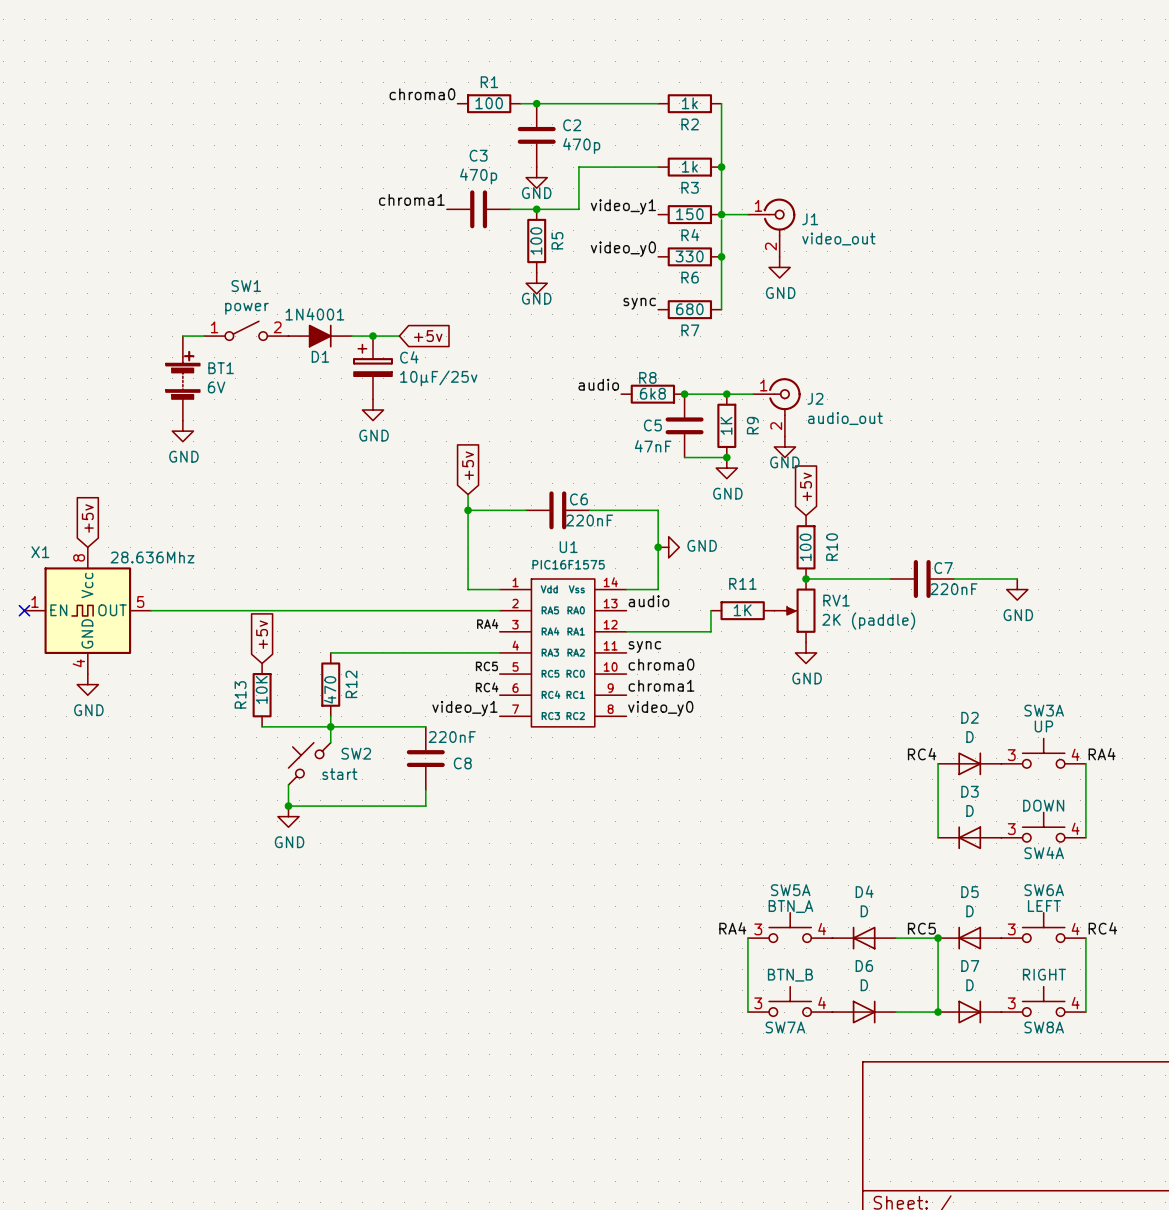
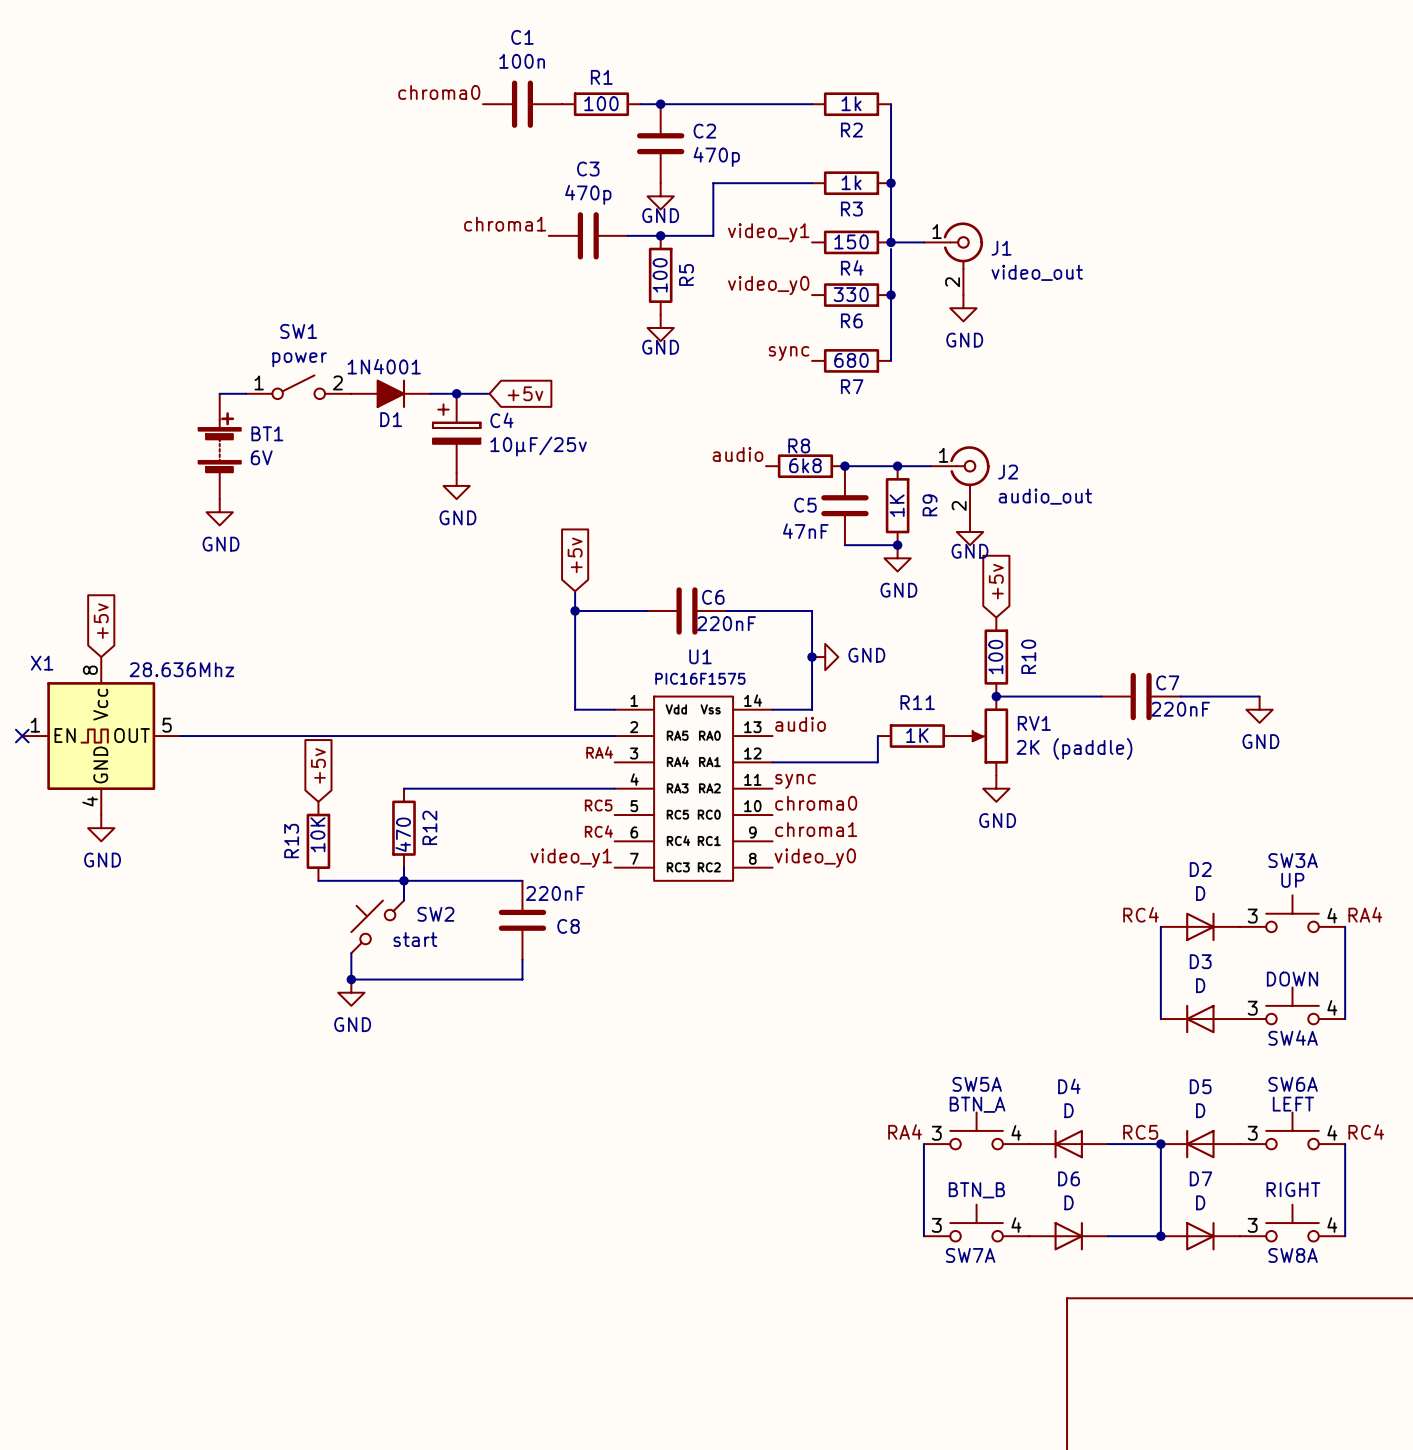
label position: chroma0 (422, 94) -> chroma0 (439, 92)
C1: none -> 100n (522, 104)

